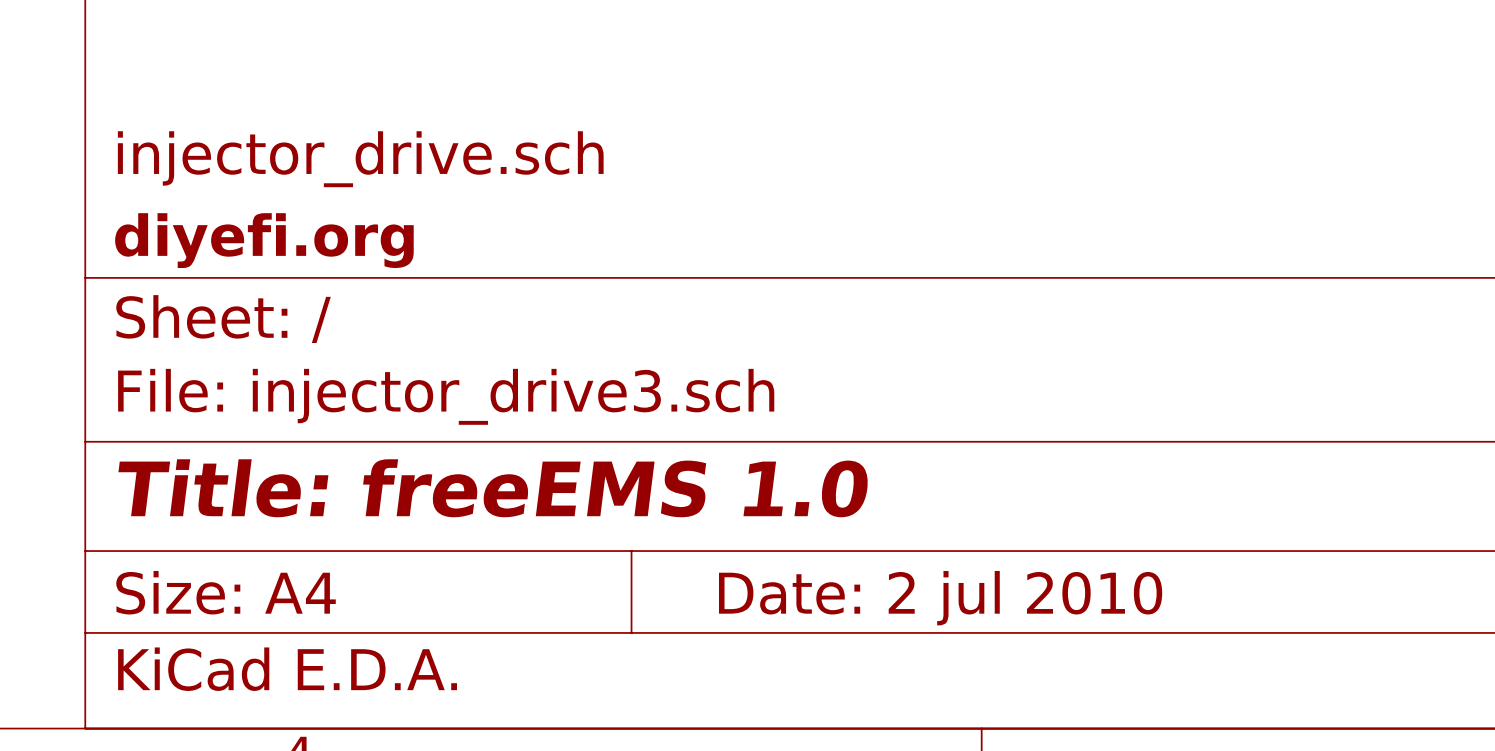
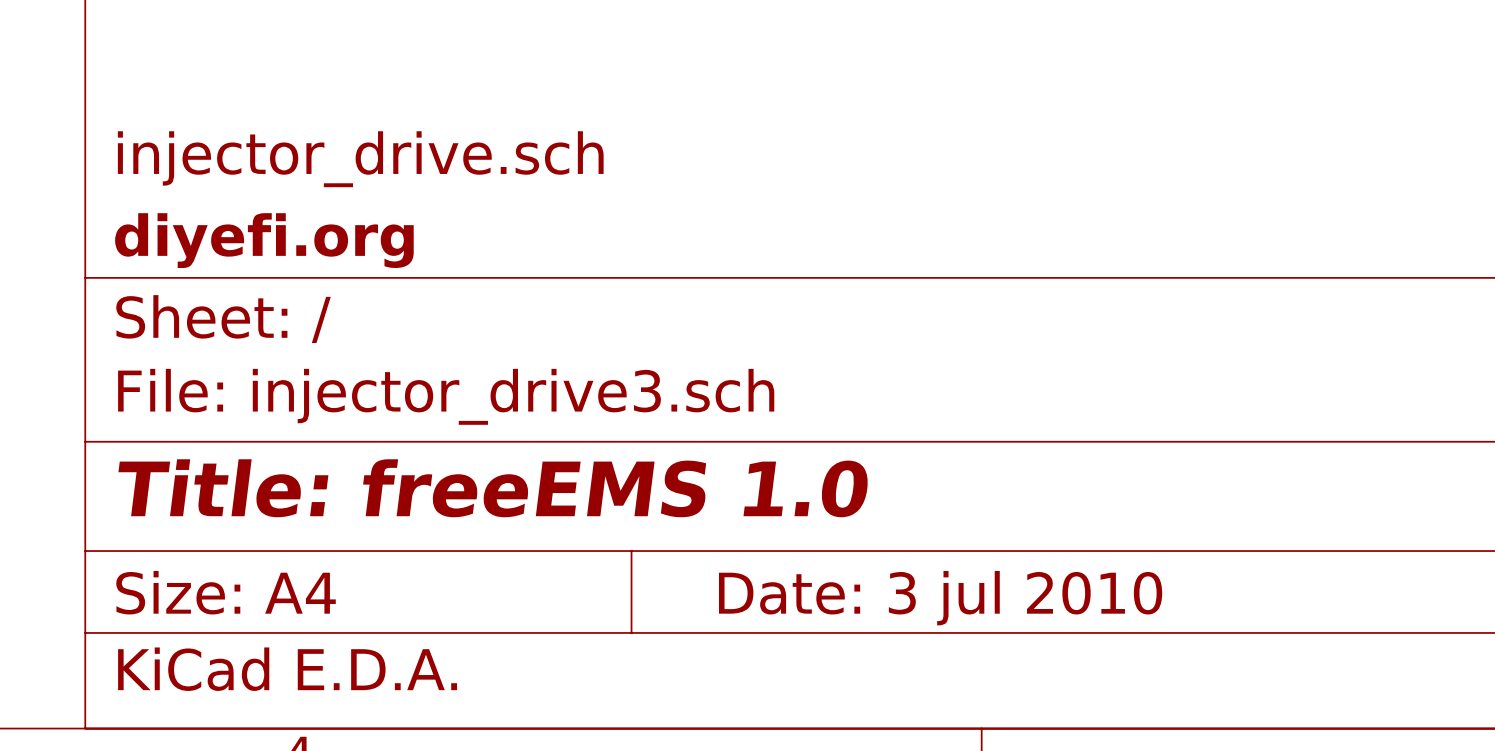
title block: Date: 2 jul 2010 (940, 598) -> Date: 3 jul 2010 (940, 598)

